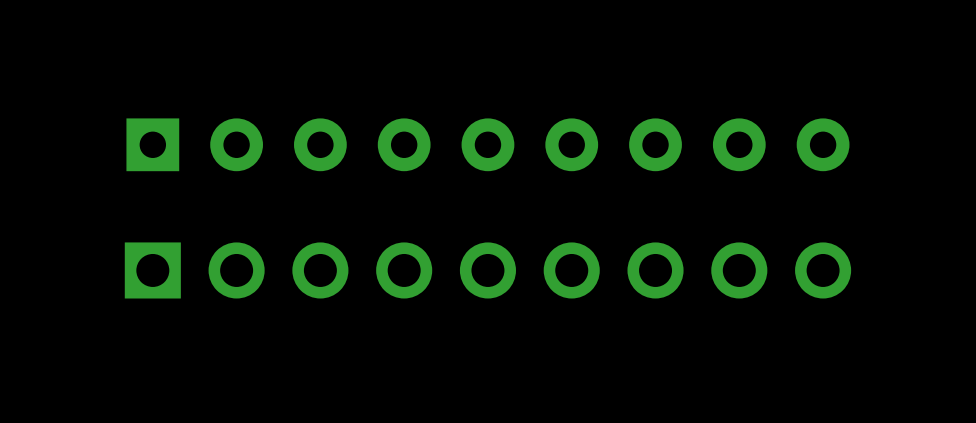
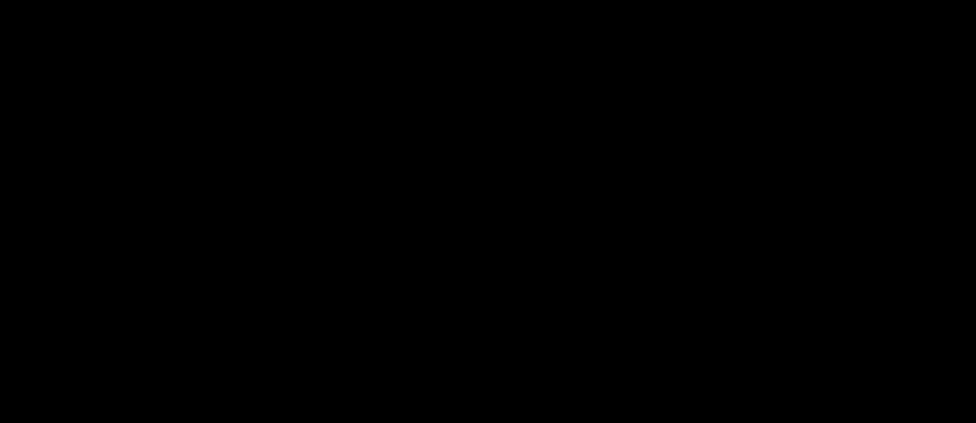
part: (487, 144) -> none
part: (487, 270) -> none

